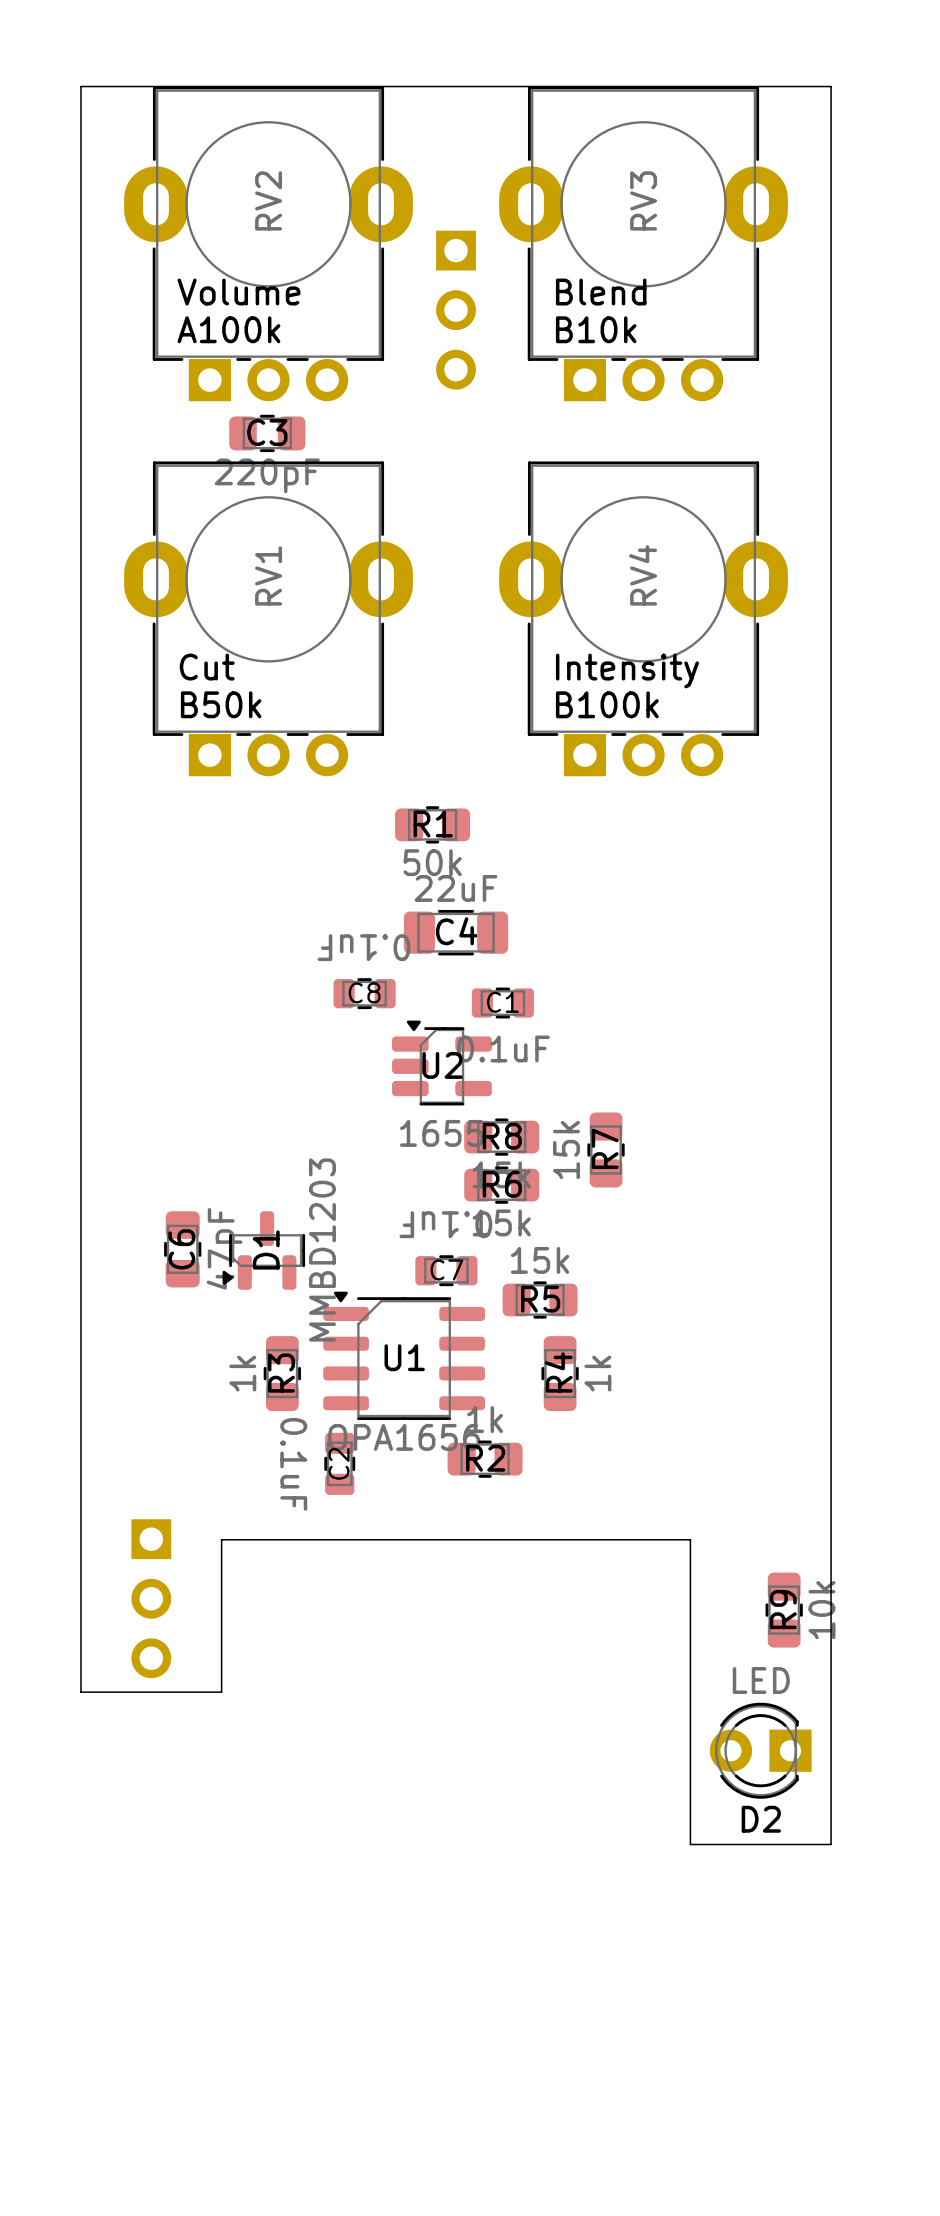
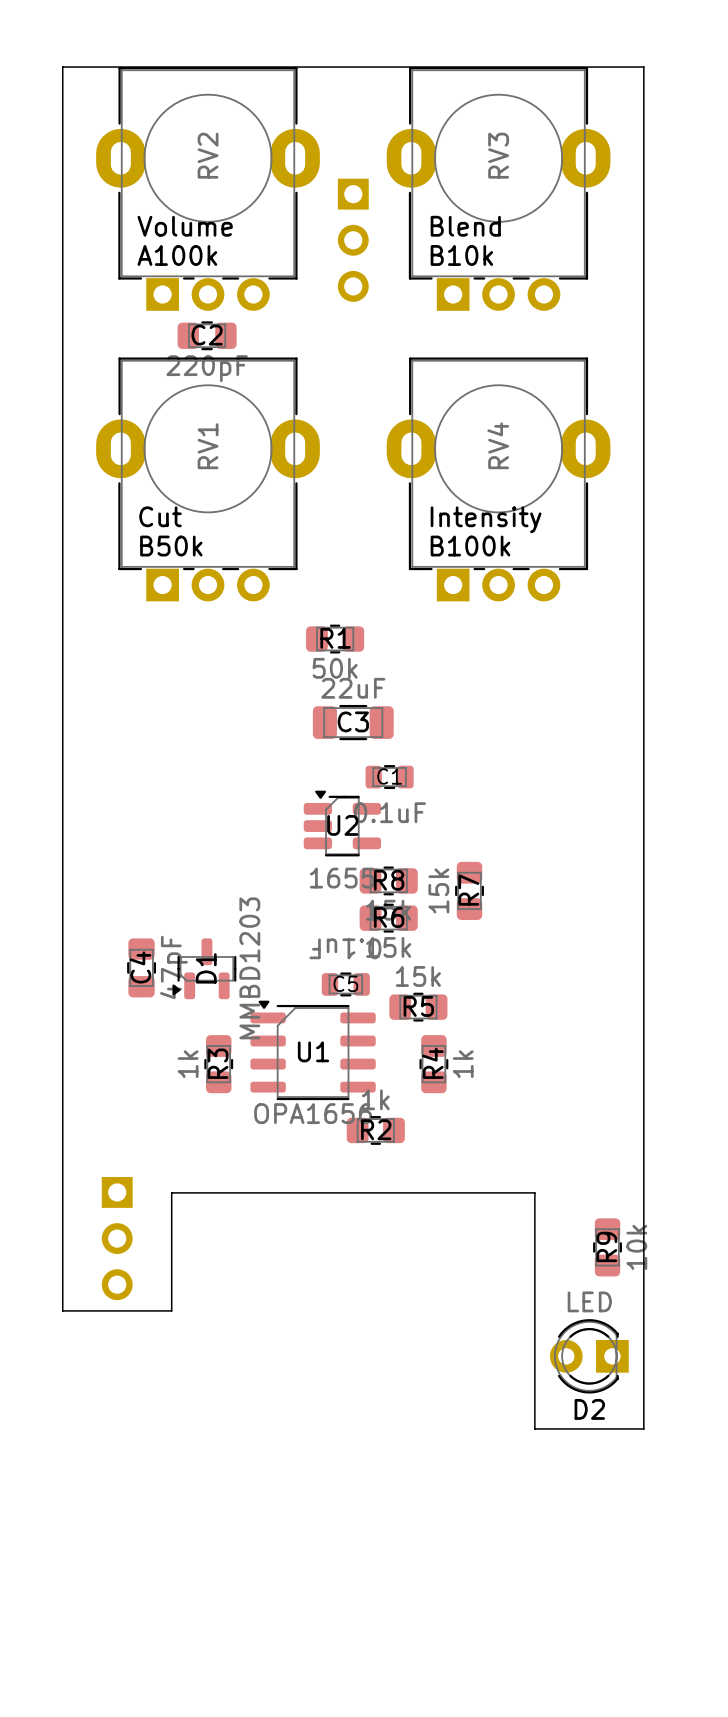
C3 name: C3 (267, 432) -> C2 (207, 335)
C4 name: C4 (456, 931) -> C3 (353, 721)
C8: 0.1uF (364, 993) -> none
C6 name: C6 (181, 1249) -> C4 (140, 967)
C7 name: C7 (446, 1269) -> C5 (345, 983)
C2: 0.1uF (339, 1463) -> none

